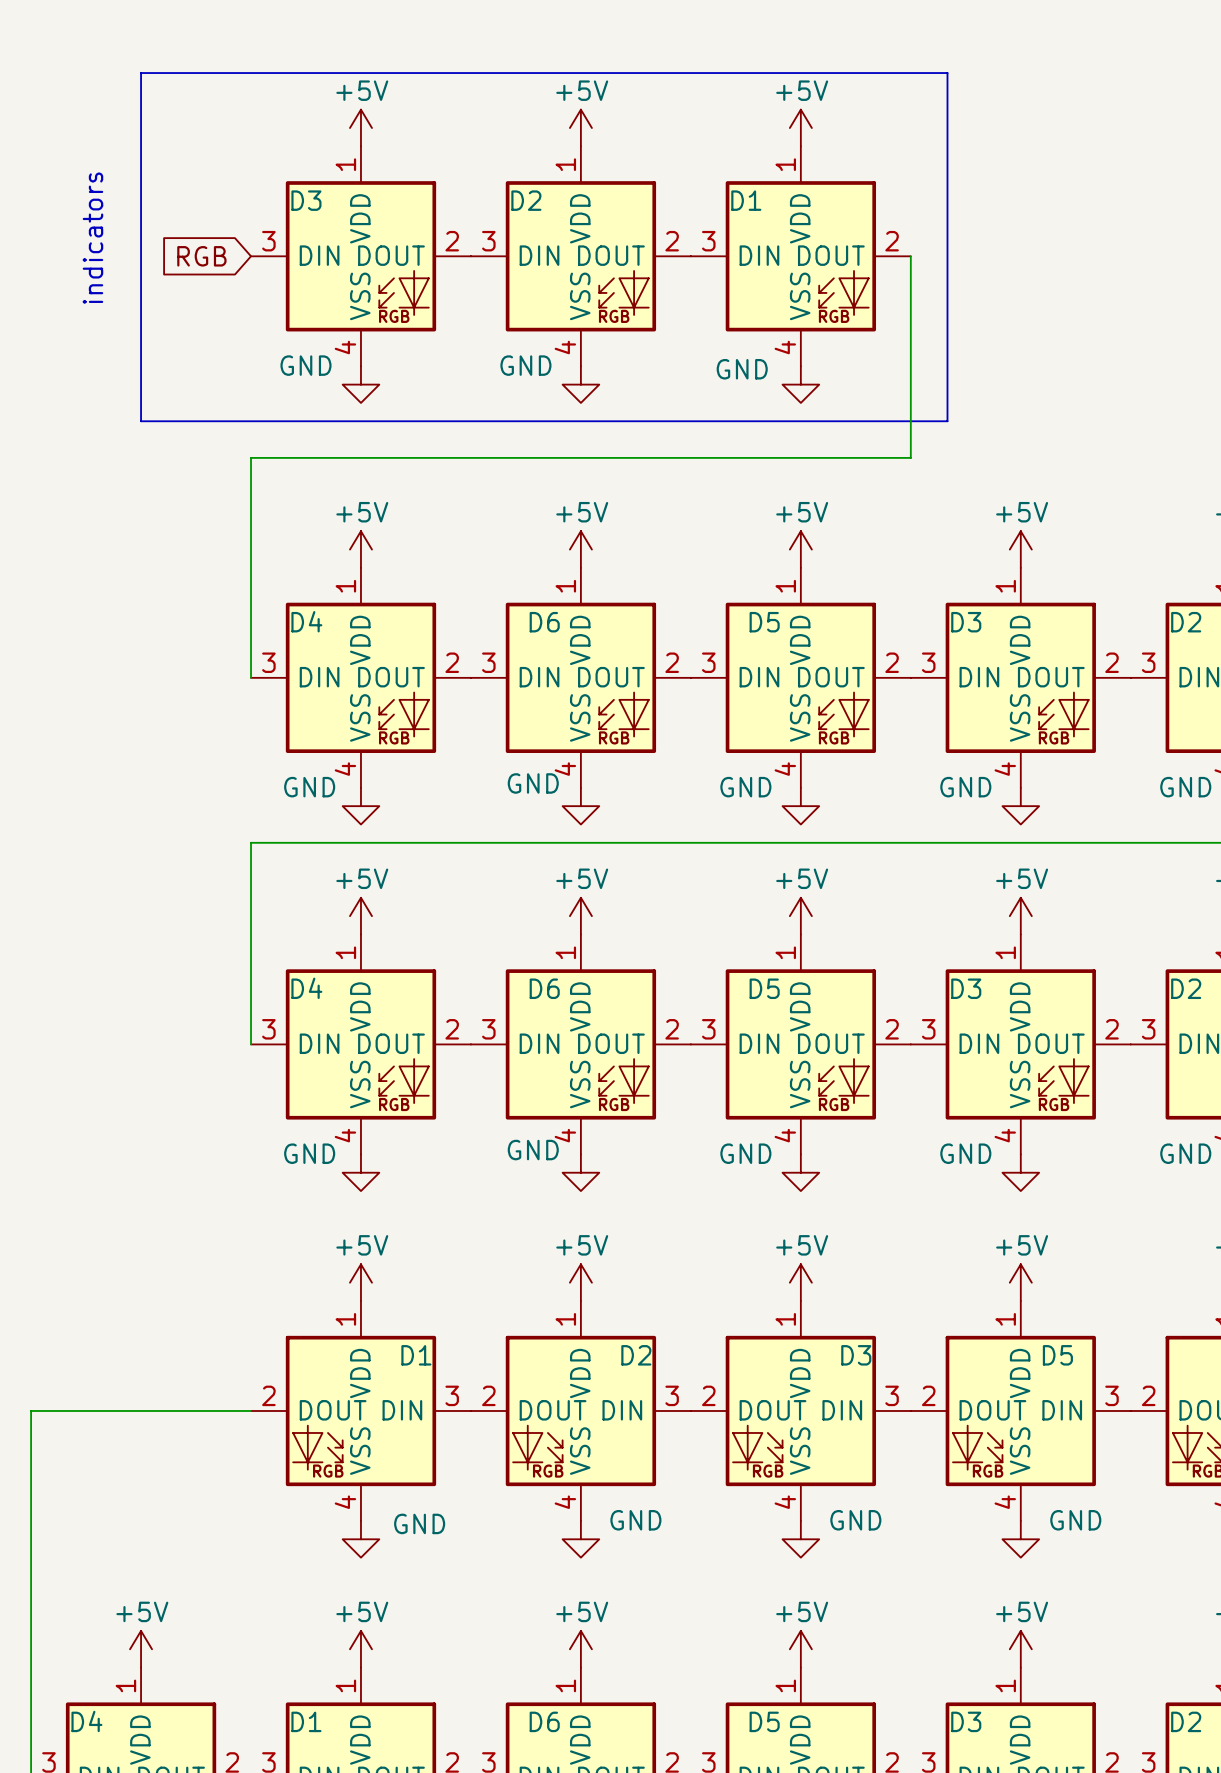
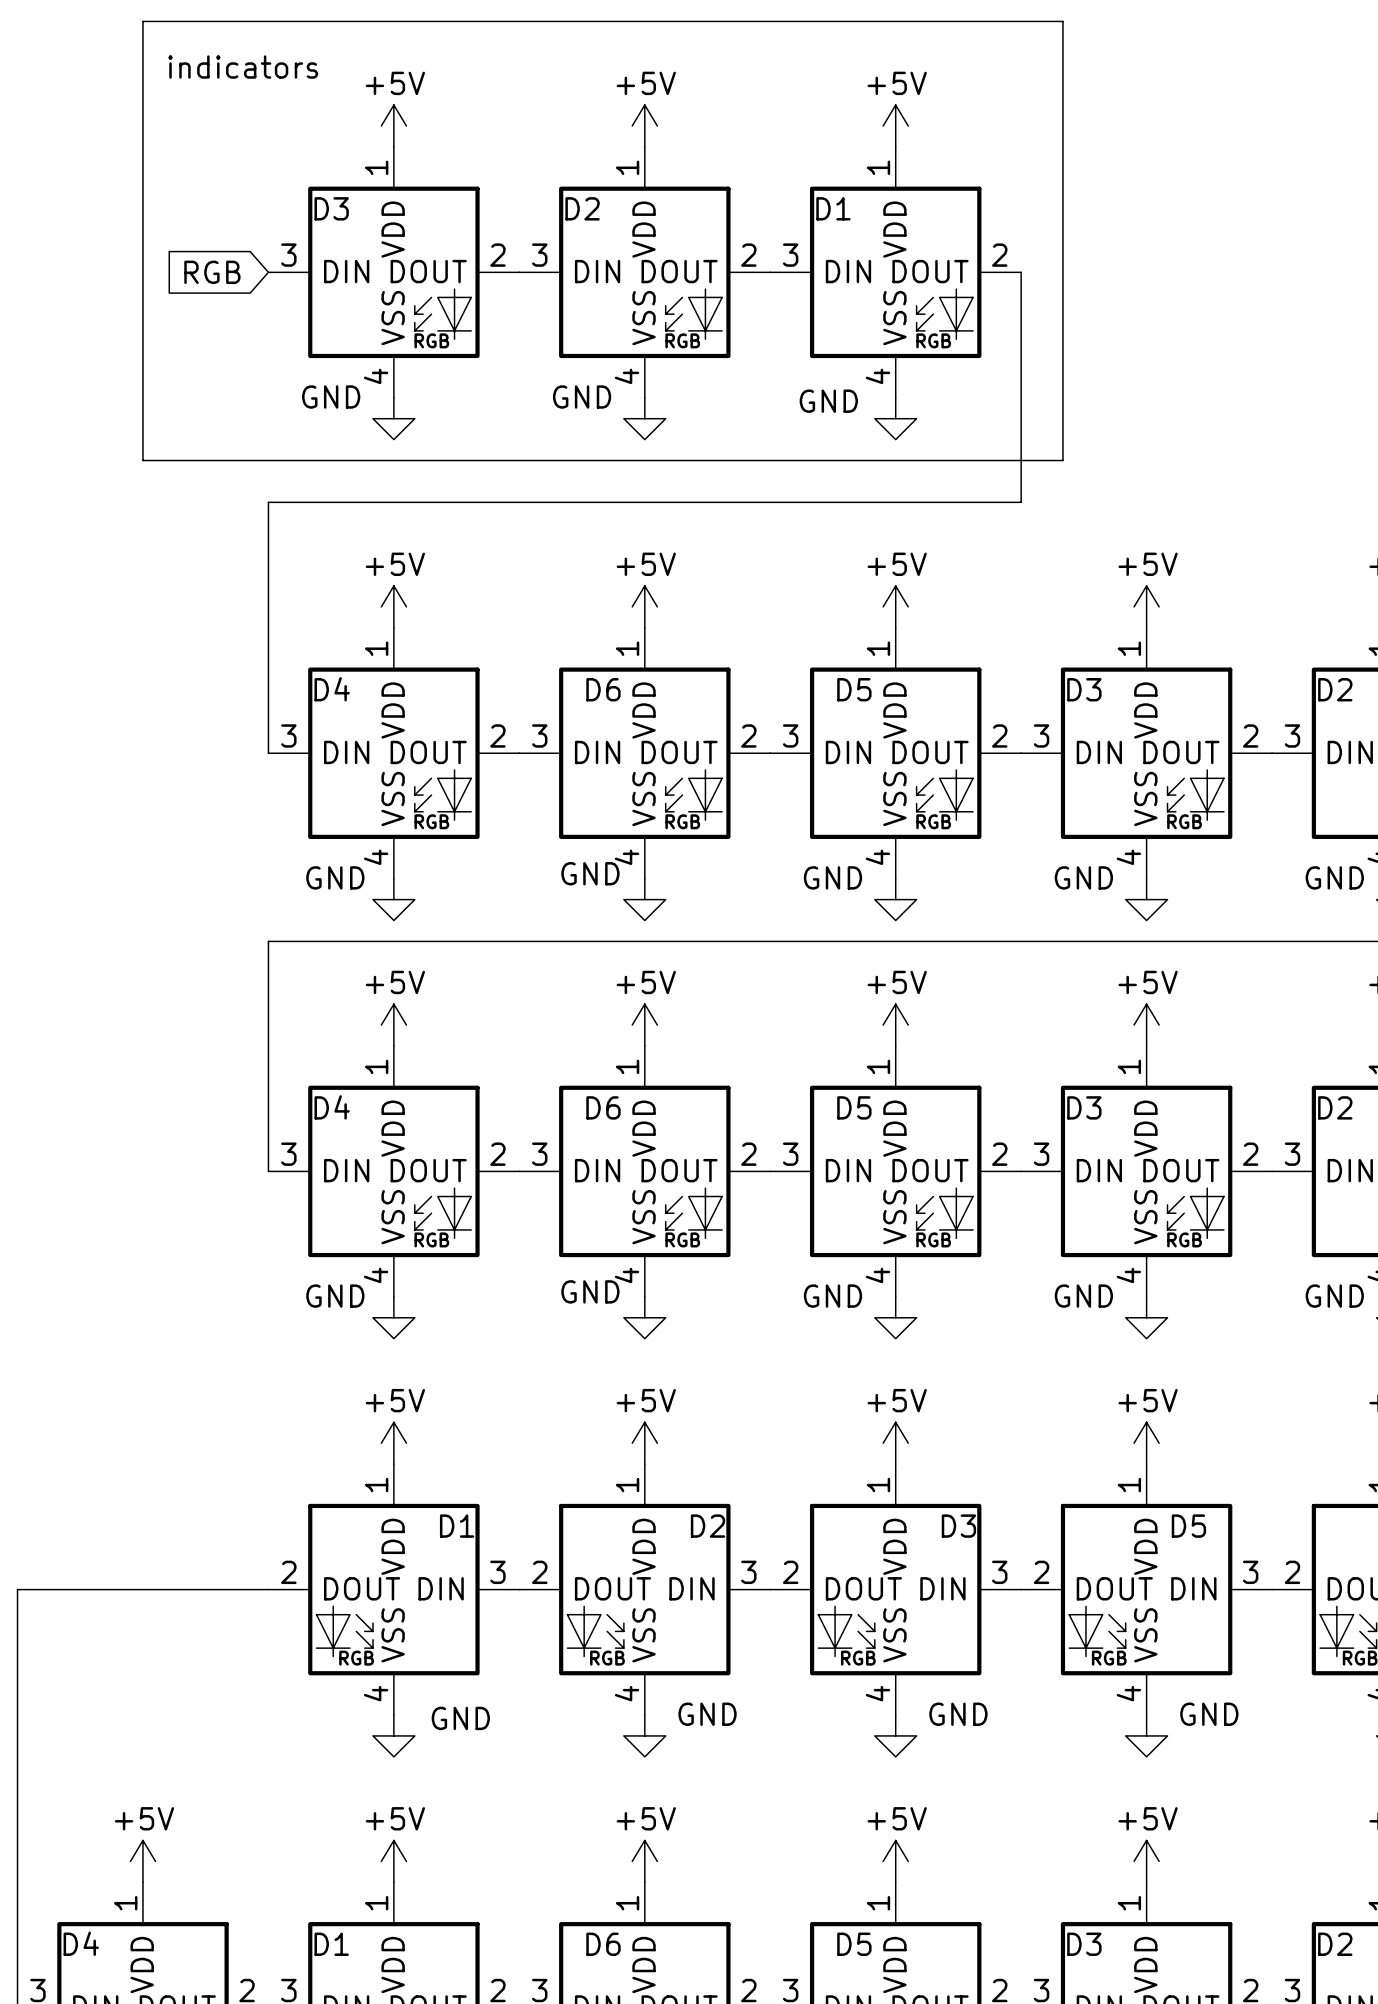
line: (141, 73) (947, 73) -> (142, 63) (142, 21) (1062, 21) (1062, 63)
text rotation: 0° (92, 238) -> 90° clockwise (243, 67)
text position: indicators (92, 238) -> indicators (243, 67)

